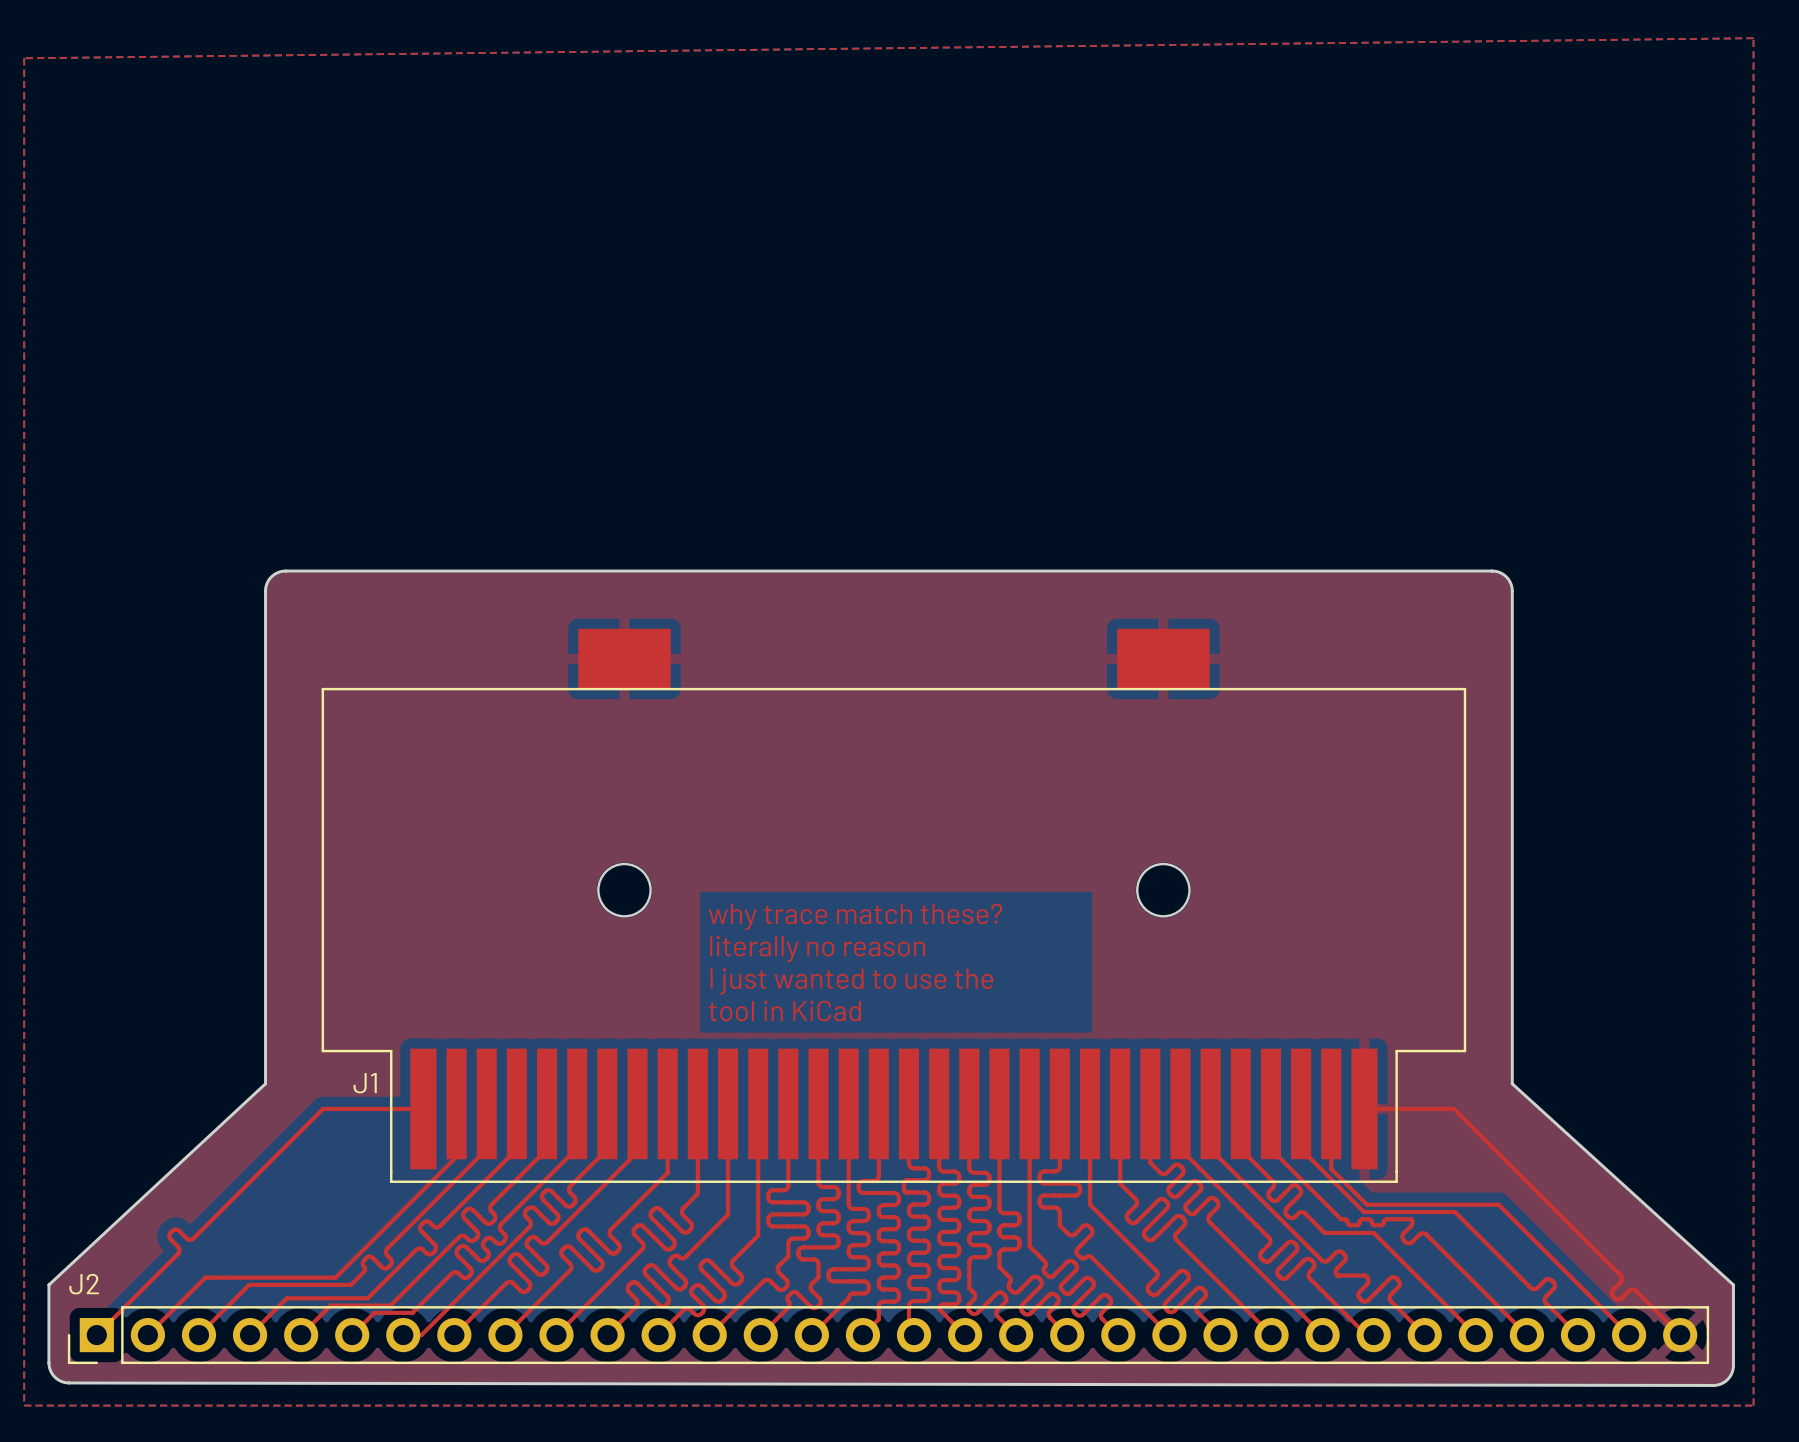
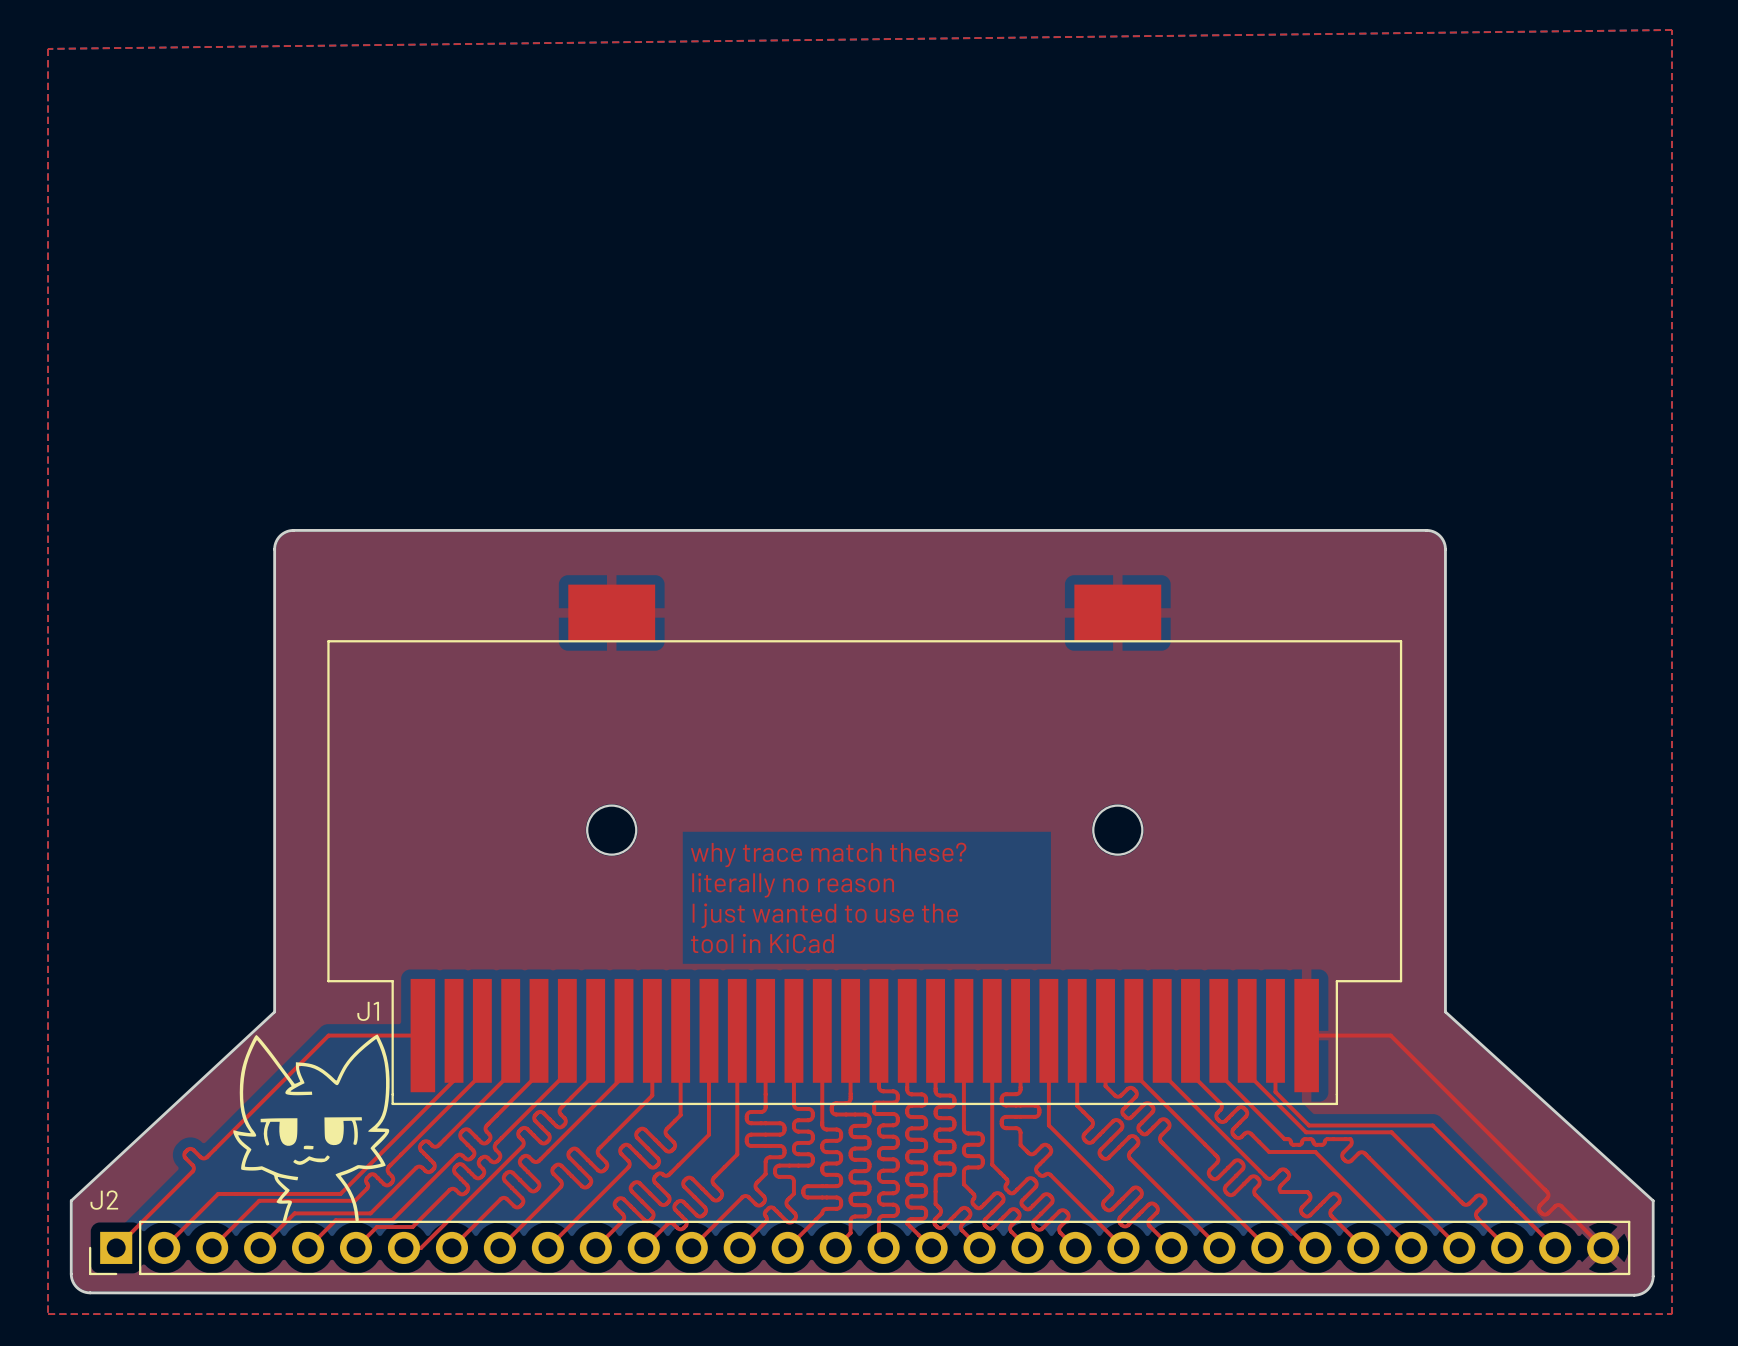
drawing: none -> [233, 1034, 390, 1222]

